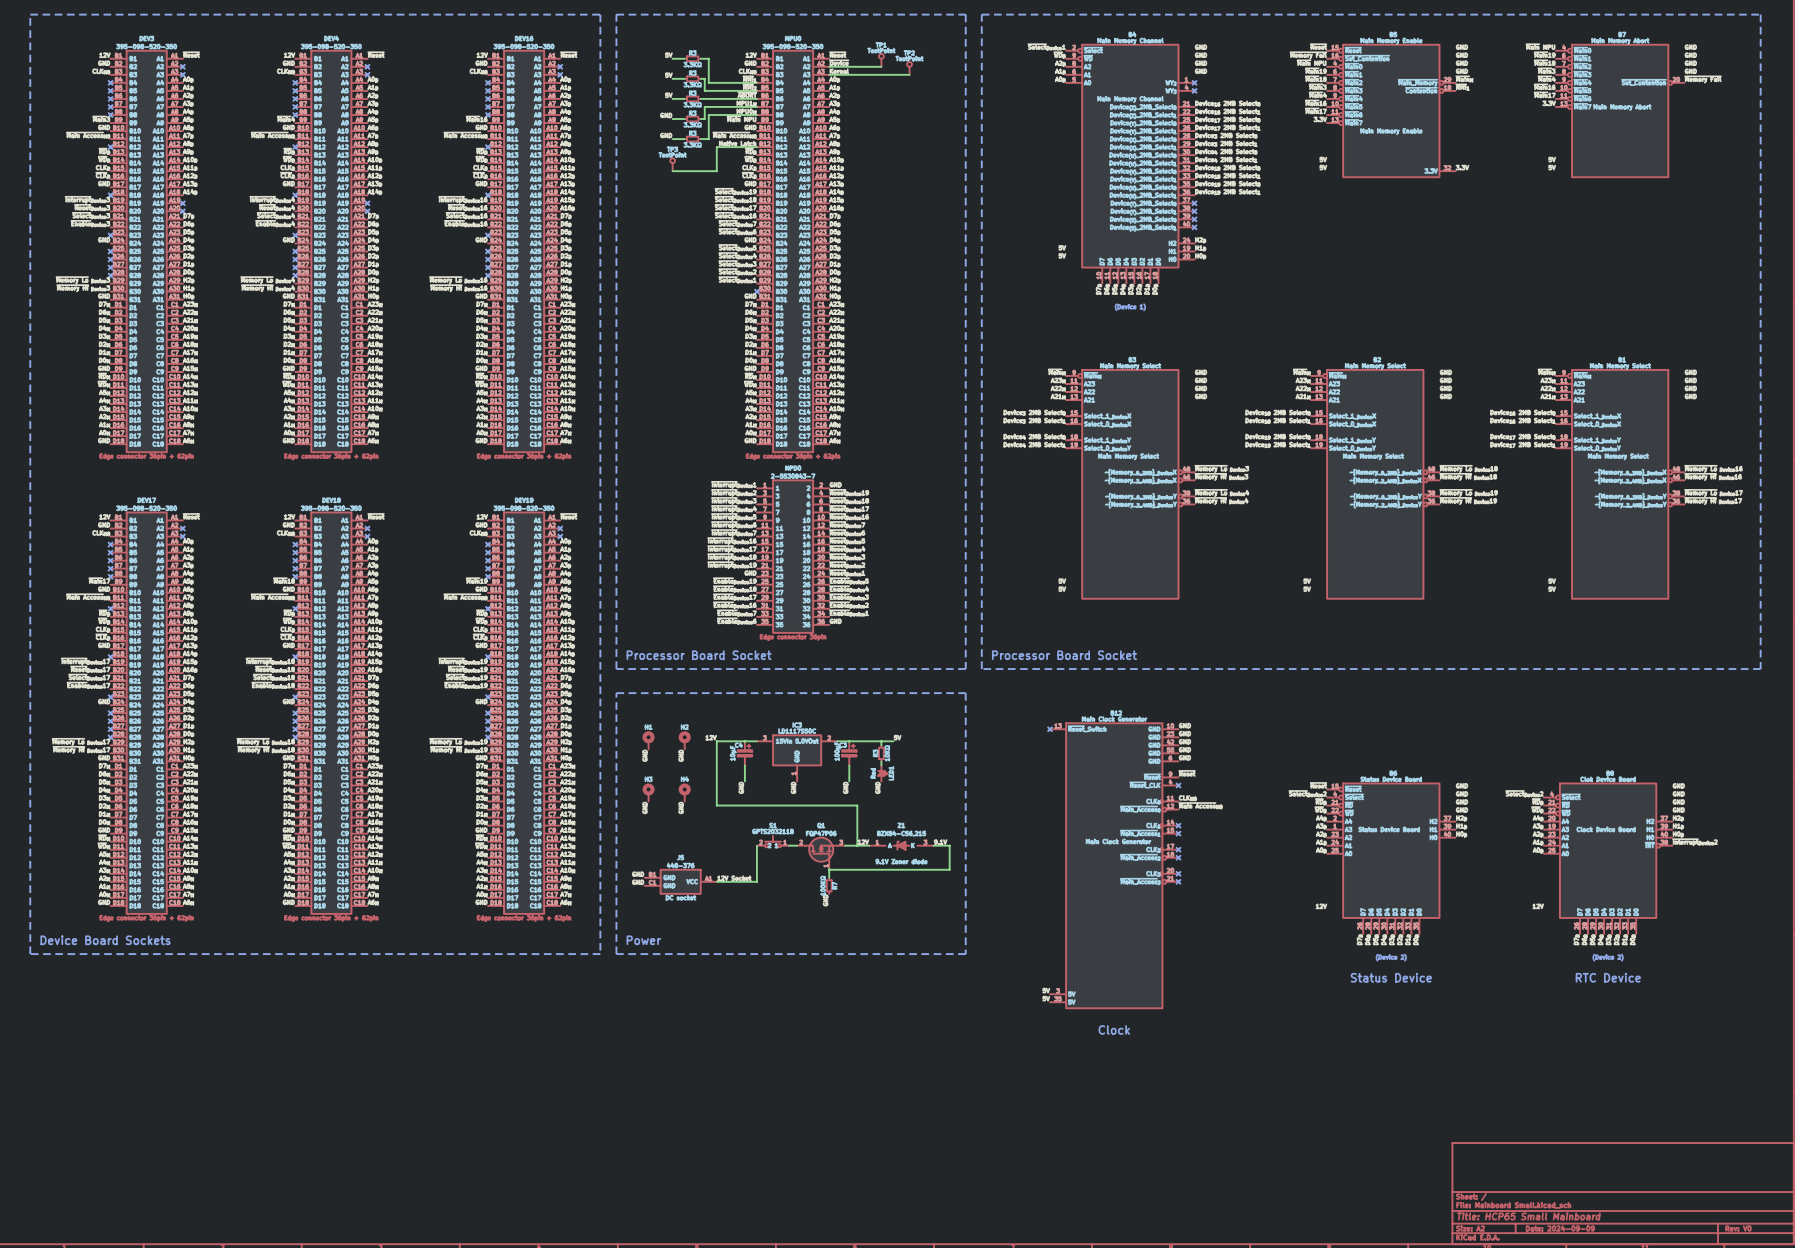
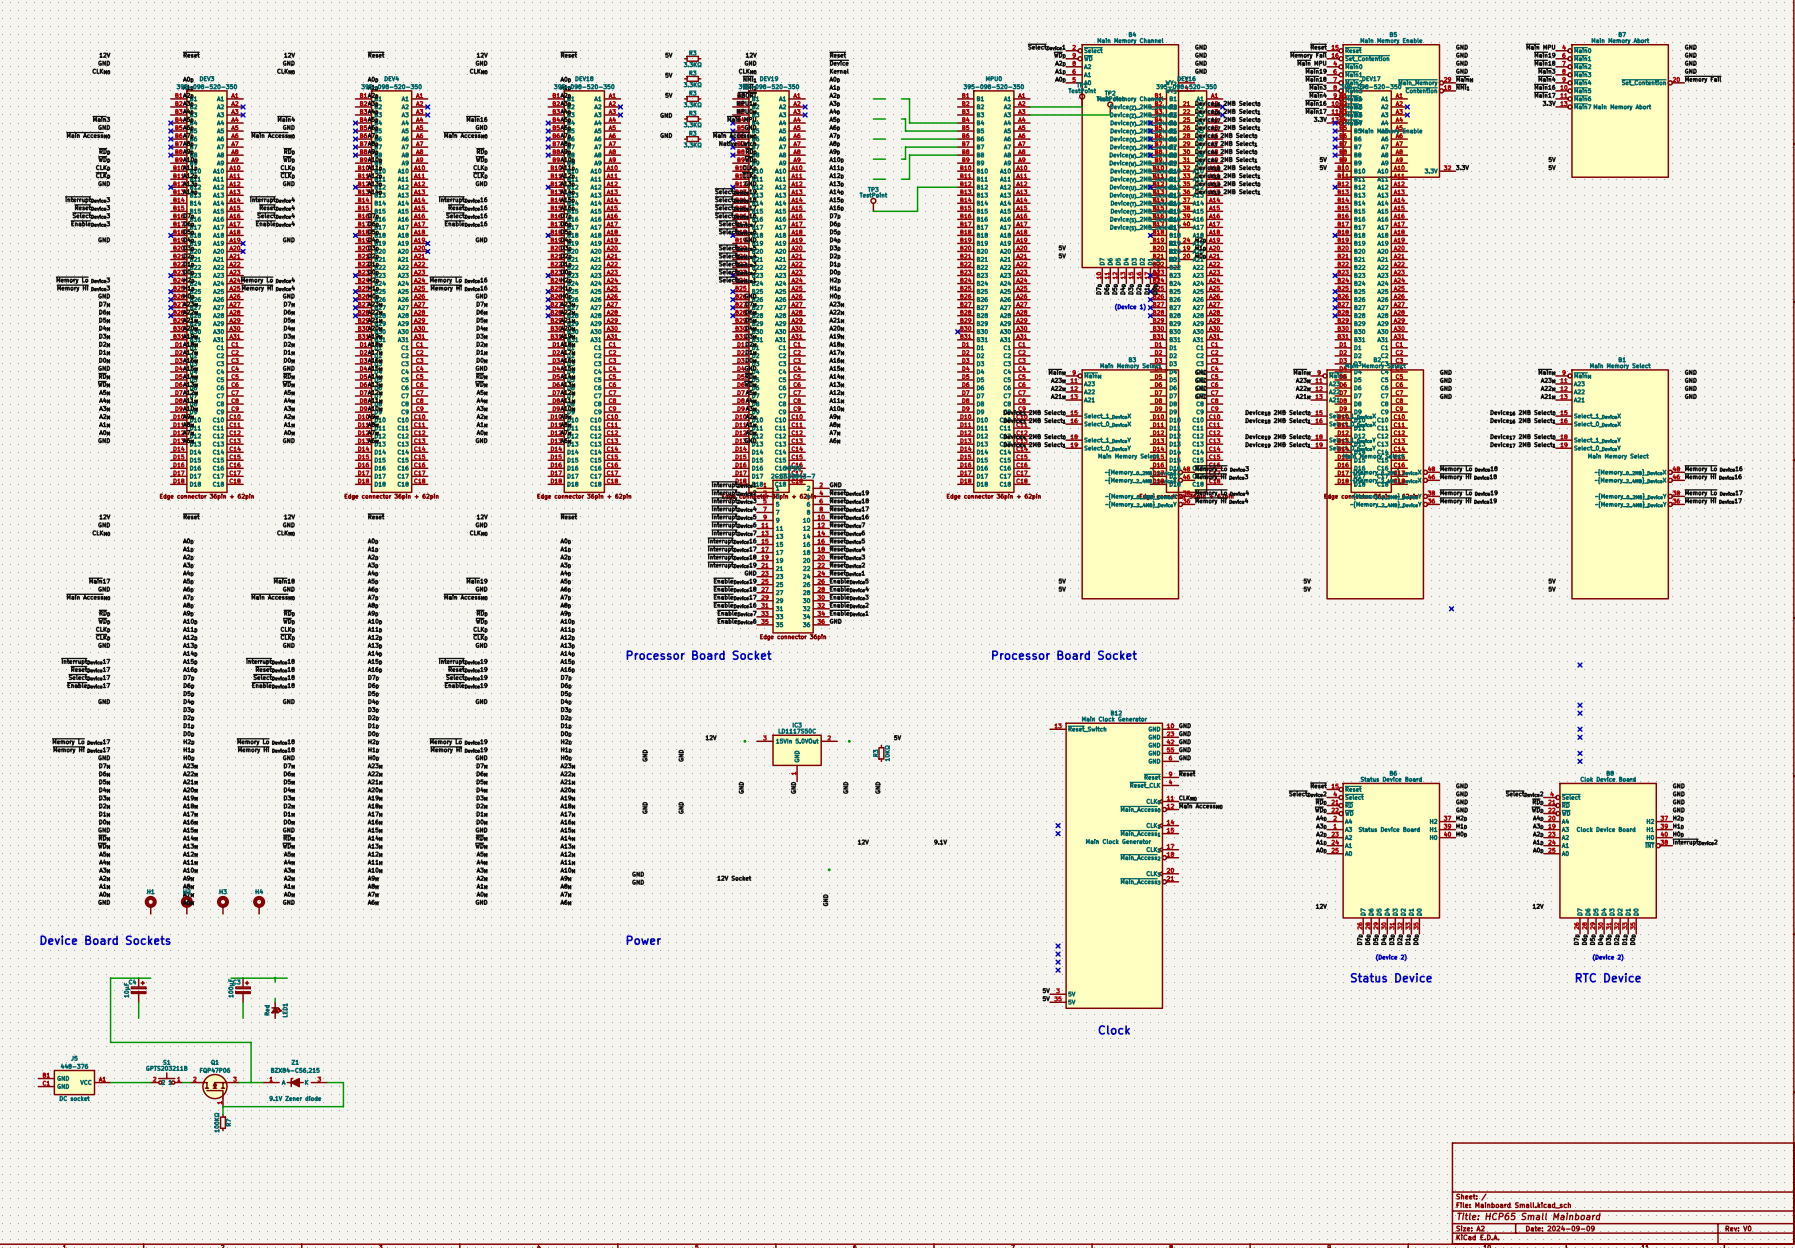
line: (30, 14) (600, 14) (600, 954) (30, 954) (30, 14) -> none
line: (616, 14) (965, 14) (965, 669) (616, 669) (616, 14) -> none
line: (981, 14) (1760, 14) (1760, 669) (981, 669) (981, 14) -> none
wire: (672, 58) (684, 58) -> none
wire: (700, 58) (708, 58) (708, 82) (756, 82) -> none
part position: (881, 60) -> (1082, 100)
no-connect mark: (182, 66) -> none
no-connect mark: (367, 66) -> none
no-connect mark: (560, 66) -> none
wire: (829, 66) (881, 66) -> none
part position: (909, 68) -> (1110, 108)
no-connect mark: (182, 74) -> none
no-connect mark: (367, 74) -> none
no-connect mark: (560, 74) -> none
wire: (829, 74) (909, 74) -> none
wire: (672, 78) (684, 78) -> none
wire: (700, 78) (704, 78) (704, 90) (756, 90) -> none
no-connect mark: (110, 82) -> none
no-connect mark: (295, 82) -> none
no-connect mark: (487, 82) -> none
no-connect mark: (1194, 82) -> none
no-connect mark: (110, 90) -> none
no-connect mark: (295, 90) -> none
no-connect mark: (487, 90) -> none
no-connect mark: (1194, 90) -> none
no-connect mark: (110, 98) -> none
no-connect mark: (295, 98) -> none
no-connect mark: (487, 98) -> none
wire: (672, 98) (684, 98) -> none
wire: (700, 98) (756, 98) -> none
wire: none -> (873, 98) (885, 98)
wire: none -> (901, 98) (909, 98) (909, 123) (957, 123)
no-connect mark: (110, 106) -> none
no-connect mark: none -> (243, 106)
no-connect mark: (295, 106) -> none
no-connect mark: none -> (427, 106)
no-connect mark: (487, 106) -> none
no-connect mark: none -> (620, 106)
wire: (756, 106) (704, 106) (704, 119) (700, 119) -> none
no-connect mark: none -> (805, 106)
wire: none -> (1029, 106) (1082, 106)
no-connect mark: none -> (1222, 106)
no-connect mark: none -> (1407, 106)
no-connect mark: (110, 114) -> none
no-connect mark: none -> (243, 114)
no-connect mark: (295, 114) -> none
no-connect mark: none -> (427, 114)
no-connect mark: (487, 114) -> none
no-connect mark: none -> (620, 114)
wire: (756, 114) (708, 114) (708, 139) (700, 139) -> none
no-connect mark: none -> (805, 114)
wire: none -> (1029, 114) (1110, 114)
no-connect mark: none -> (1222, 114)
no-connect mark: none -> (1407, 114)
wire: (672, 119) (684, 119) -> none
wire: none -> (873, 119) (885, 119)
wire: none -> (901, 119) (905, 119) (905, 131) (957, 131)
no-connect mark: none -> (170, 123)
no-connect mark: none -> (355, 123)
no-connect mark: none -> (548, 123)
no-connect mark: none -> (732, 123)
no-connect mark: none -> (1150, 123)
no-connect mark: none -> (1335, 123)
no-connect mark: none -> (170, 131)
no-connect mark: none -> (355, 131)
no-connect mark: none -> (548, 131)
no-connect mark: none -> (732, 131)
no-connect mark: none -> (1150, 131)
no-connect mark: none -> (1335, 131)
no-connect mark: none -> (170, 139)
no-connect mark: none -> (355, 139)
no-connect mark: none -> (548, 139)
wire: (672, 139) (684, 139) -> none
no-connect mark: none -> (732, 139)
wire: none -> (873, 139) (885, 139)
wire: none -> (901, 139) (957, 139)
no-connect mark: none -> (1150, 139)
no-connect mark: none -> (1335, 139)
no-connect mark: (110, 147) -> none
no-connect mark: none -> (170, 147)
no-connect mark: (295, 147) -> none
no-connect mark: none -> (355, 147)
no-connect mark: (487, 147) -> none
no-connect mark: none -> (548, 147)
no-connect mark: none -> (732, 147)
wire: (756, 147) (716, 147) (716, 171) (672, 171) -> none
wire: none -> (957, 147) (905, 147) (905, 159) (901, 159)
no-connect mark: none -> (1150, 147)
no-connect mark: none -> (1335, 147)
no-connect mark: none -> (170, 155)
no-connect mark: none -> (355, 155)
no-connect mark: none -> (548, 155)
no-connect mark: none -> (732, 155)
wire: none -> (957, 155) (909, 155) (909, 179) (901, 179)
no-connect mark: none -> (1150, 155)
no-connect mark: none -> (1335, 155)
wire: none -> (873, 159) (885, 159)
part position: (672, 164) -> (873, 204)
wire: none -> (873, 179) (885, 179)
no-connect mark: none -> (170, 187)
no-connect mark: none -> (355, 187)
no-connect mark: none -> (548, 187)
no-connect mark: none -> (732, 187)
wire: none -> (957, 187) (917, 187) (917, 211) (873, 211)
no-connect mark: none -> (1150, 187)
no-connect mark: none -> (1335, 187)
no-connect mark: (110, 195) -> none
no-connect mark: (295, 195) -> none
no-connect mark: (487, 195) -> none
no-connect mark: (182, 203) -> none
no-connect mark: (367, 203) -> none
no-connect mark: (1194, 203) -> none
no-connect mark: (182, 211) -> none
no-connect mark: (367, 211) -> none
no-connect mark: (1194, 211) -> none
no-connect mark: (1194, 219) -> none
no-connect mark: (1194, 227) -> none
no-connect mark: (110, 235) -> none
no-connect mark: none -> (170, 235)
no-connect mark: (295, 235) -> none
no-connect mark: none -> (355, 235)
no-connect mark: (487, 235) -> none
no-connect mark: none -> (548, 235)
no-connect mark: none -> (732, 235)
no-connect mark: none -> (1150, 235)
no-connect mark: none -> (1335, 235)
no-connect mark: none -> (243, 243)
no-connect mark: none -> (427, 243)
no-connect mark: (110, 251) -> none
part position: (146, 251) -> (206, 291)
no-connect mark: none -> (243, 251)
no-connect mark: (295, 251) -> none
part position: (331, 251) -> (391, 291)
no-connect mark: none -> (427, 251)
no-connect mark: (487, 251) -> none
part position: (524, 251) -> (1186, 291)
part position: (793, 251) -> (993, 291)
no-connect mark: (110, 259) -> none
no-connect mark: (295, 259) -> none
no-connect mark: (487, 259) -> none
no-connect mark: (110, 267) -> none
no-connect mark: (295, 267) -> none
no-connect mark: (487, 267) -> none
no-connect mark: (110, 275) -> none
no-connect mark: none -> (170, 275)
no-connect mark: (295, 275) -> none
no-connect mark: none -> (355, 275)
no-connect mark: (487, 275) -> none
no-connect mark: none -> (548, 275)
no-connect mark: none -> (732, 275)
no-connect mark: none -> (1150, 275)
no-connect mark: none -> (1335, 275)
no-connect mark: none -> (170, 291)
no-connect mark: none -> (355, 291)
no-connect mark: none -> (548, 291)
no-connect mark: none -> (732, 291)
no-connect mark: (756, 291) -> none
no-connect mark: none -> (1150, 291)
no-connect mark: none -> (1335, 291)
no-connect mark: none -> (170, 299)
no-connect mark: none -> (355, 299)
no-connect mark: none -> (548, 299)
no-connect mark: none -> (732, 299)
no-connect mark: none -> (1150, 299)
no-connect mark: none -> (1335, 299)
no-connect mark: none -> (170, 307)
no-connect mark: none -> (355, 307)
no-connect mark: none -> (548, 307)
no-connect mark: none -> (732, 307)
no-connect mark: none -> (1150, 307)
no-connect mark: none -> (1335, 307)
no-connect mark: none -> (170, 315)
no-connect mark: none -> (355, 315)
no-connect mark: none -> (548, 315)
no-connect mark: none -> (732, 315)
no-connect mark: none -> (1150, 315)
no-connect mark: none -> (1335, 315)
no-connect mark: none -> (957, 331)
no-connect mark: (182, 528) -> none
no-connect mark: (367, 528) -> none
no-connect mark: (560, 528) -> none
no-connect mark: (182, 536) -> none
no-connect mark: (367, 536) -> none
no-connect mark: (560, 536) -> none
no-connect mark: (110, 544) -> none
no-connect mark: (295, 544) -> none
no-connect mark: (487, 544) -> none
no-connect mark: (110, 552) -> none
no-connect mark: (295, 552) -> none
no-connect mark: (487, 552) -> none
no-connect mark: (110, 560) -> none
no-connect mark: (295, 560) -> none
no-connect mark: (487, 560) -> none
no-connect mark: (110, 568) -> none
no-connect mark: (295, 568) -> none
no-connect mark: (487, 568) -> none
no-connect mark: (110, 576) -> none
no-connect mark: (295, 576) -> none
no-connect mark: (487, 576) -> none
no-connect mark: (110, 608) -> none
no-connect mark: (295, 608) -> none
no-connect mark: (487, 608) -> none
no-connect mark: none -> (1451, 608)
no-connect mark: (110, 656) -> none
no-connect mark: (295, 656) -> none
no-connect mark: (487, 656) -> none
no-connect mark: none -> (1580, 665)
line: (616, 693) (965, 693) (965, 954) (616, 954) (616, 693) -> none
no-connect mark: (110, 697) -> none
no-connect mark: (295, 697) -> none
no-connect mark: (487, 697) -> none
no-connect mark: none -> (1580, 705)
no-connect mark: (110, 713) -> none
part position: (146, 713) -> (1371, 291)
no-connect mark: (295, 713) -> none
part position: (331, 713) -> (584, 291)
no-connect mark: (487, 713) -> none
part position: (524, 713) -> (769, 291)
no-connect mark: none -> (1580, 713)
no-connect mark: (110, 721) -> none
no-connect mark: (295, 721) -> none
no-connect mark: (487, 721) -> none
no-connect mark: (110, 729) -> none
no-connect mark: (295, 729) -> none
no-connect mark: (487, 729) -> none
no-connect mark: (1050, 729) -> none
no-connect mark: none -> (1580, 729)
no-connect mark: (110, 737) -> none
no-connect mark: (295, 737) -> none
no-connect mark: (487, 737) -> none
no-connect mark: none -> (1580, 737)
part position: (648, 740) -> (150, 904)
part position: (684, 740) -> (186, 904)
wire: (756, 741) (716, 741) (716, 805) (857, 805) (857, 845) -> none
wire: (837, 741) (893, 741) -> none
wire: (881, 741) (881, 745) -> none
part position: (744, 753) -> (138, 990)
part position: (849, 753) -> (243, 990)
no-connect mark: none -> (1580, 753)
wire: (881, 761) (881, 765) -> none
no-connect mark: none -> (1580, 761)
wire: (744, 765) (744, 781) -> none
wire: (849, 765) (849, 781) -> none
part position: (882, 773) -> (276, 1010)
no-connect mark: (1178, 785) -> none
part position: (648, 792) -> (222, 904)
part position: (684, 792) -> (259, 904)
no-connect mark: none -> (1058, 825)
no-connect mark: (1178, 825) -> none
no-connect mark: none -> (1058, 833)
no-connect mark: (1178, 833) -> none
part position: (773, 841) -> (166, 1078)
wire: (756, 845) (756, 881) (716, 881) -> none
wire: (789, 845) (797, 845) -> none
wire: (845, 845) (869, 845) -> none
part position: (901, 845) -> (295, 1082)
wire: (933, 845) (949, 845) (949, 869) (829, 869) (829, 877) -> none
no-connect mark: (1178, 849) -> none
part position: (821, 853) -> (214, 1090)
no-connect mark: (1178, 857) -> none
no-connect mark: (1178, 873) -> none
part position: (680, 881) -> (74, 1082)
no-connect mark: (1178, 881) -> none
part position: (829, 885) -> (222, 1122)
no-connect mark: none -> (1058, 946)
no-connect mark: none -> (1058, 954)
no-connect mark: none -> (1058, 962)
no-connect mark: none -> (1058, 970)
wire: none -> (150, 978) (110, 978) (110, 1042) (251, 1042) (251, 1082)
wire: none -> (231, 978) (287, 978)
wire: none -> (275, 978) (275, 982)
wire: none -> (275, 998) (275, 1002)
wire: none -> (138, 1002) (138, 1018)
wire: none -> (243, 1002) (243, 1018)
wire: none -> (110, 1082) (150, 1082)
wire: none -> (182, 1082) (190, 1082)
wire: none -> (239, 1082) (263, 1082)
wire: none -> (327, 1082) (343, 1082) (343, 1106) (222, 1106) (222, 1114)

